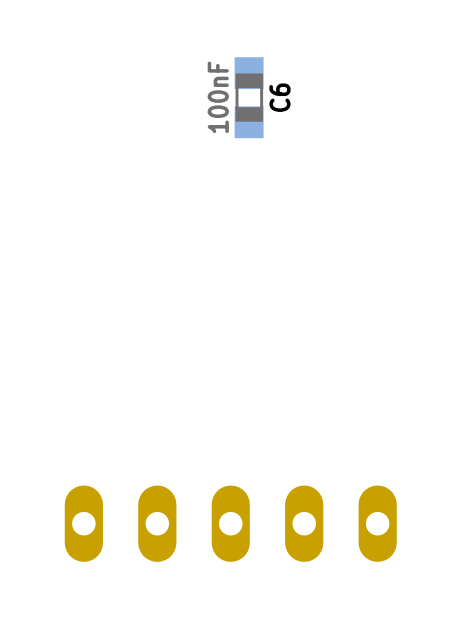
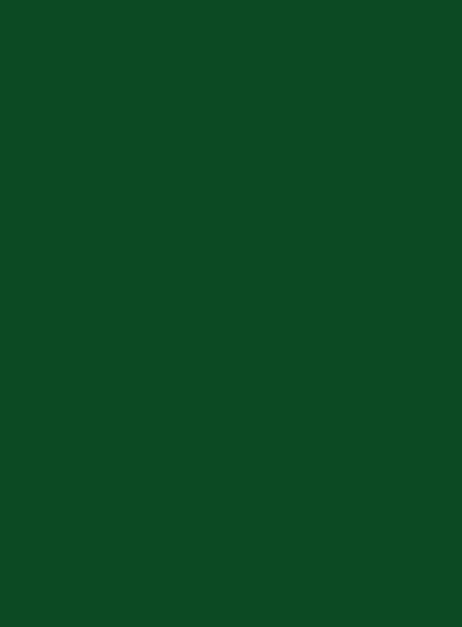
C6: 100nF (249, 97) -> none
part: (230, 523) -> none

